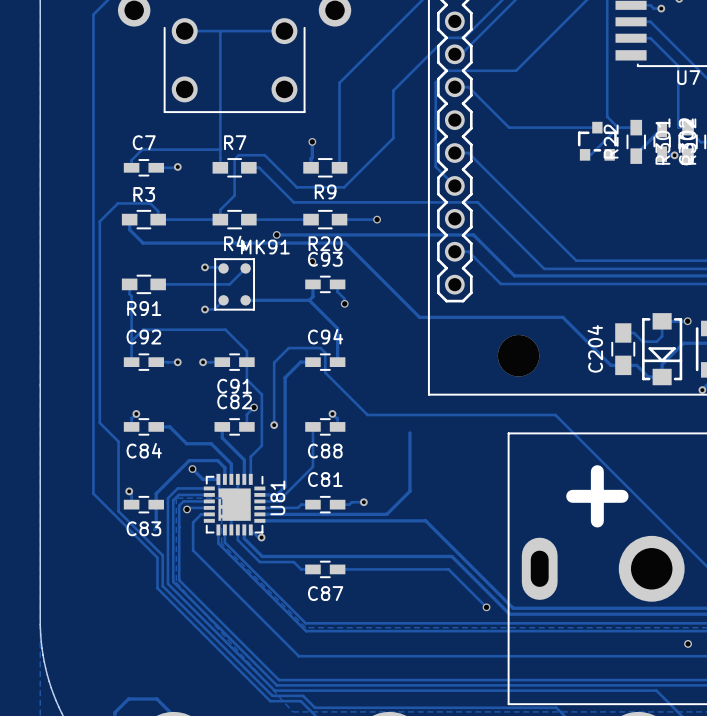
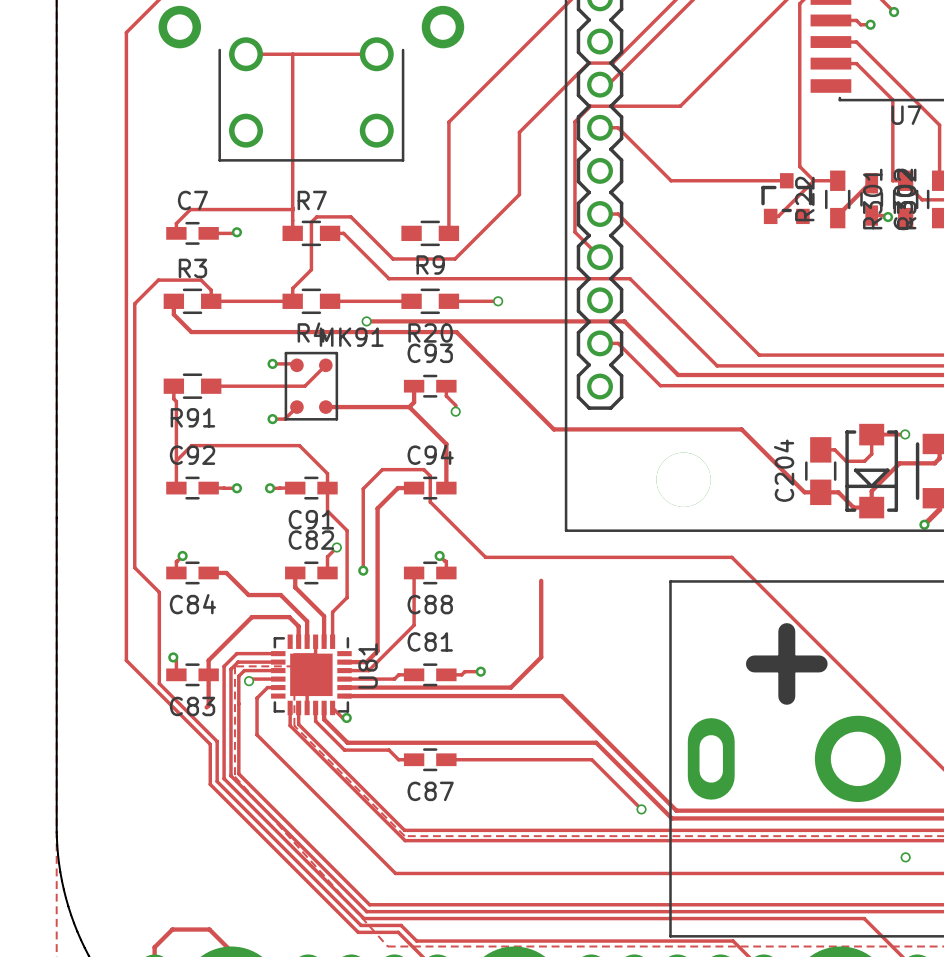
track: (312, 141) (311, 167) -> none
via: (312, 141) -> none
via: (312, 261) -> none
track: (192, 469) (202, 479) (218, 479) (218, 489) (234, 504) -> none
via: (192, 469) -> none

